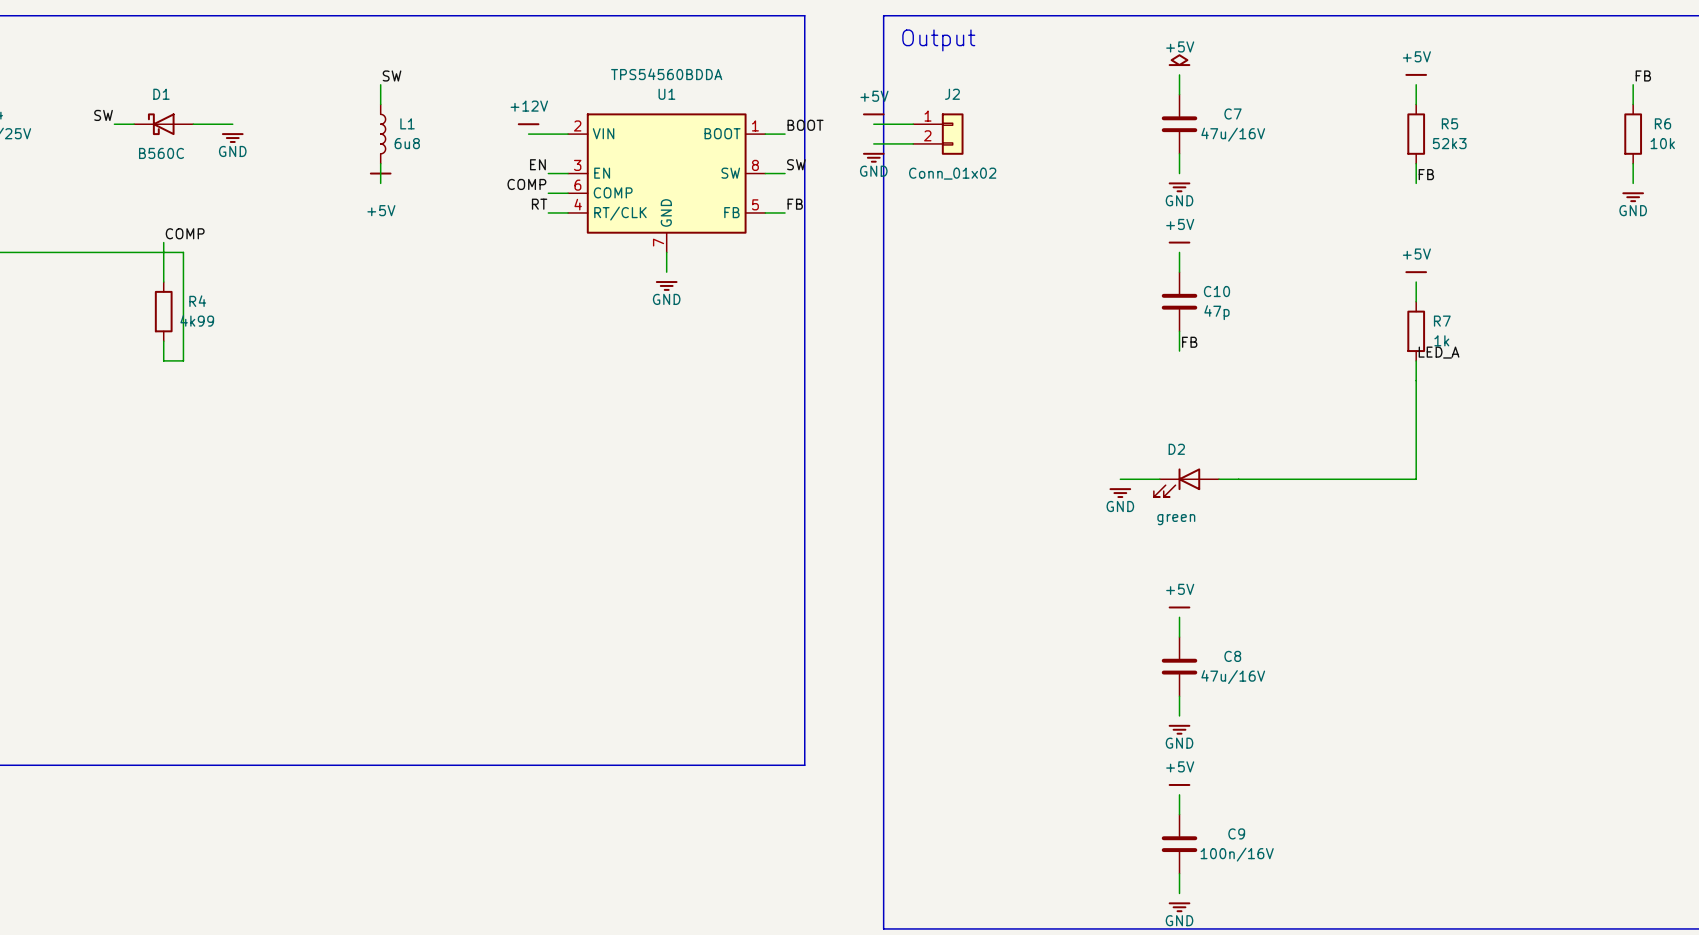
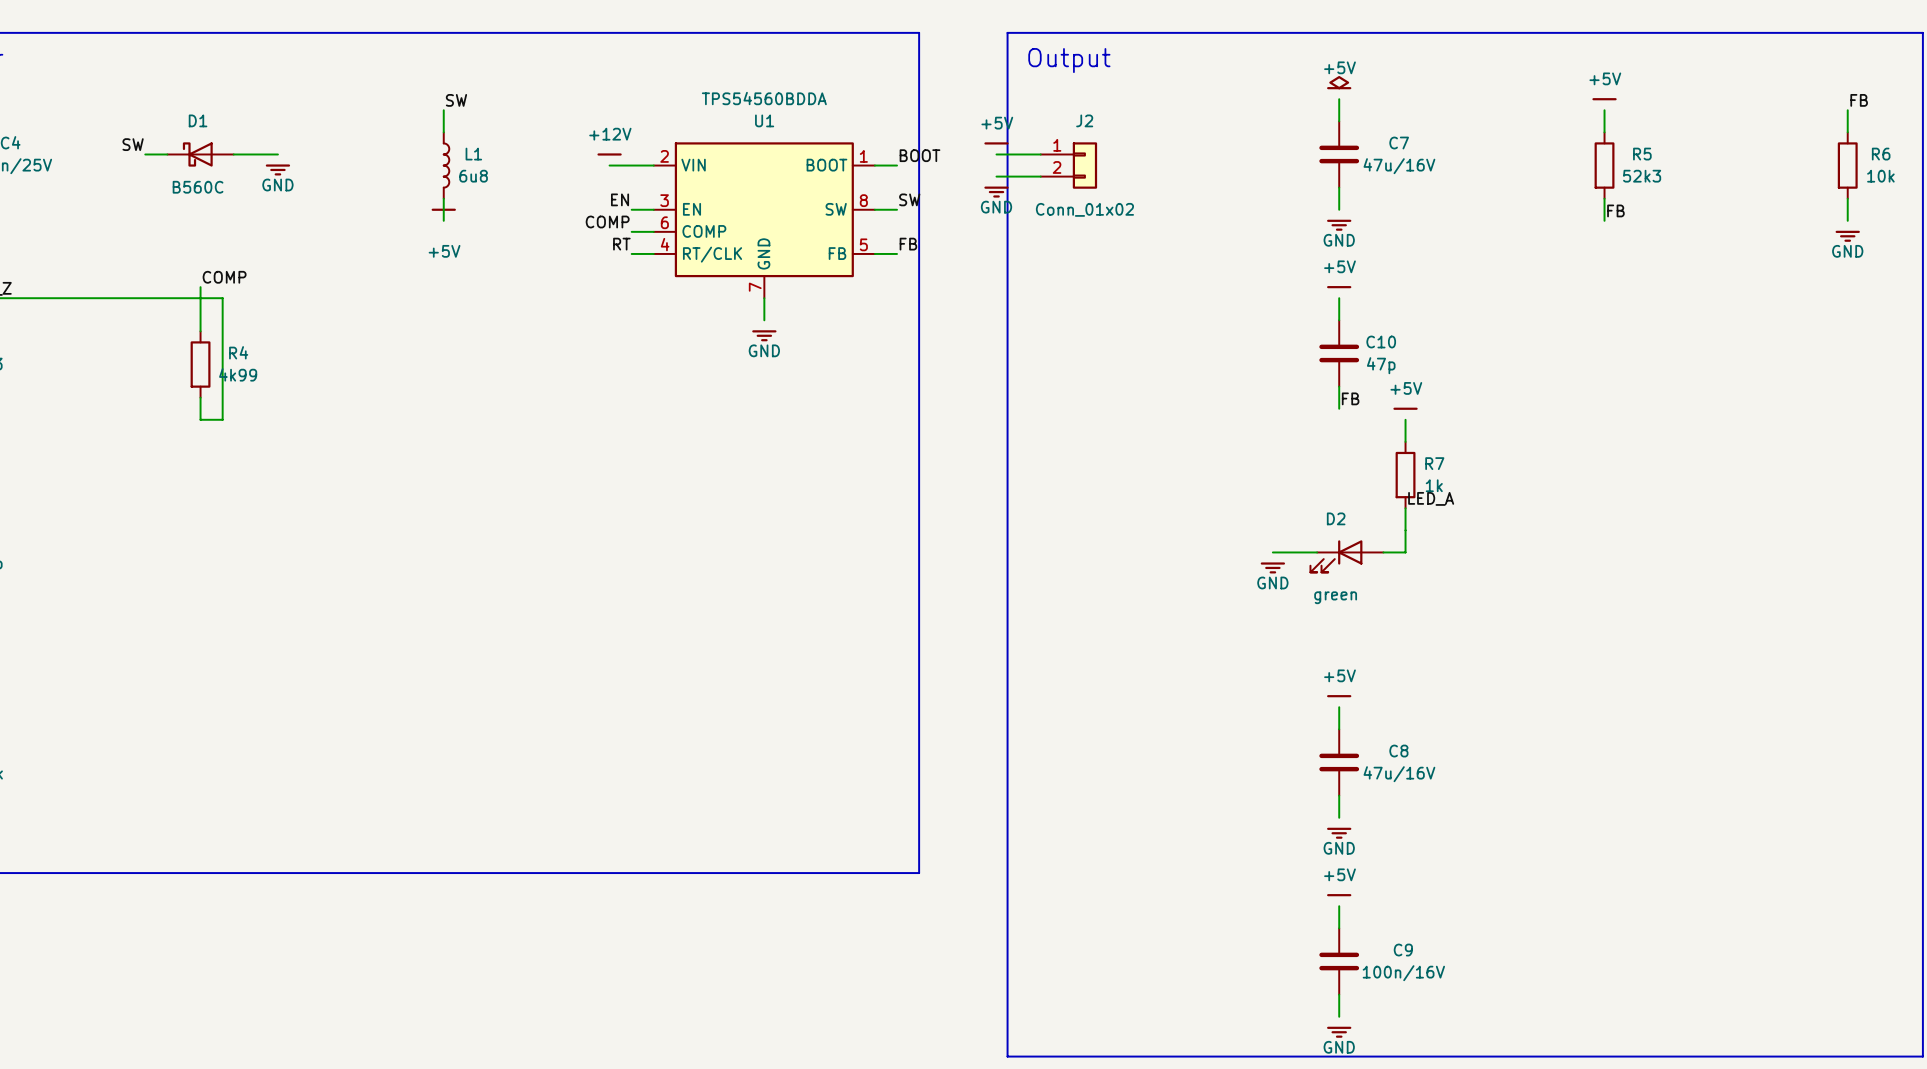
power symbol: +5V (1416, 272) -> none
wire: (1416, 282) (1416, 301) -> none
R7 position: (1416, 331) -> (1405, 475)
power symbol: none -> +5V (1405, 408)
label: LED_A (1439, 352) -> none
wire: none -> (1405, 419) (1405, 441)
wire: (1416, 360) (1416, 479) (1238, 479) -> (1405, 508) (1405, 552)
label: none -> LED_A (1431, 498)

